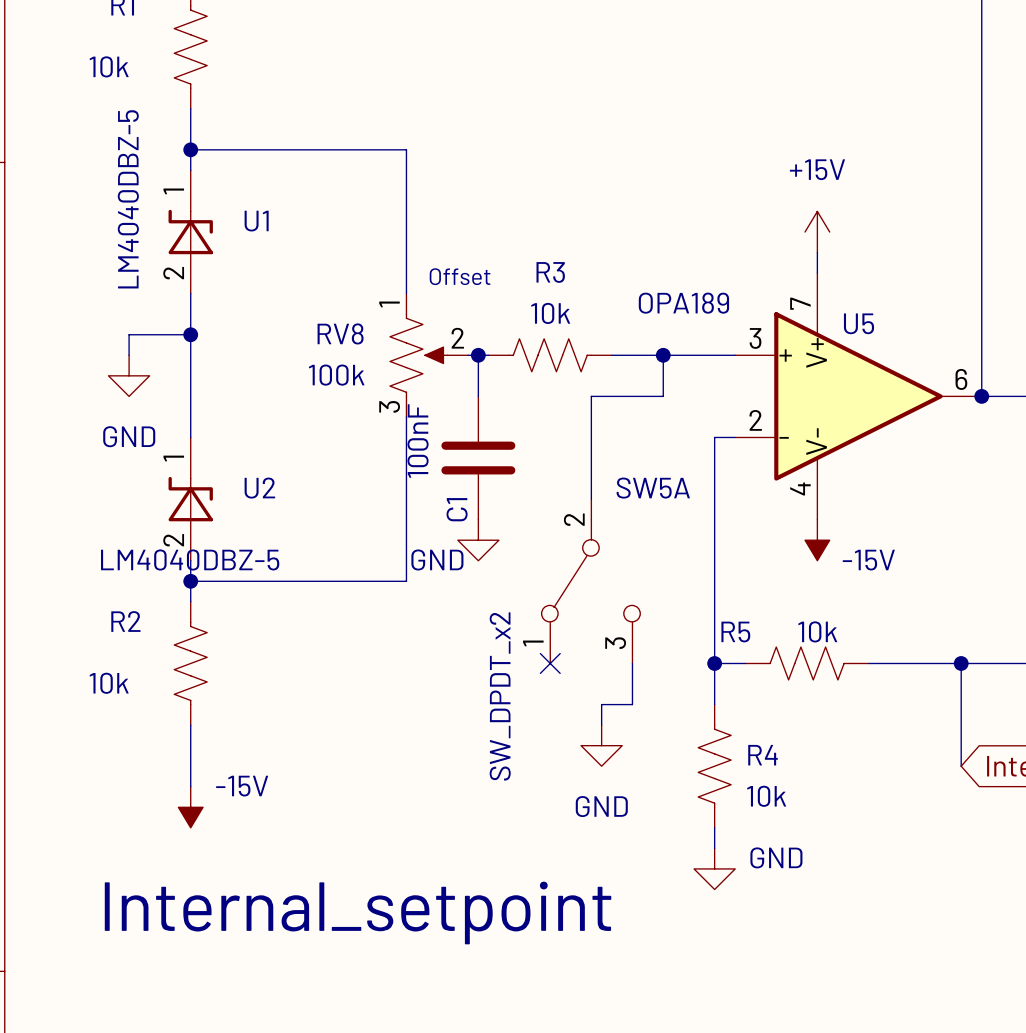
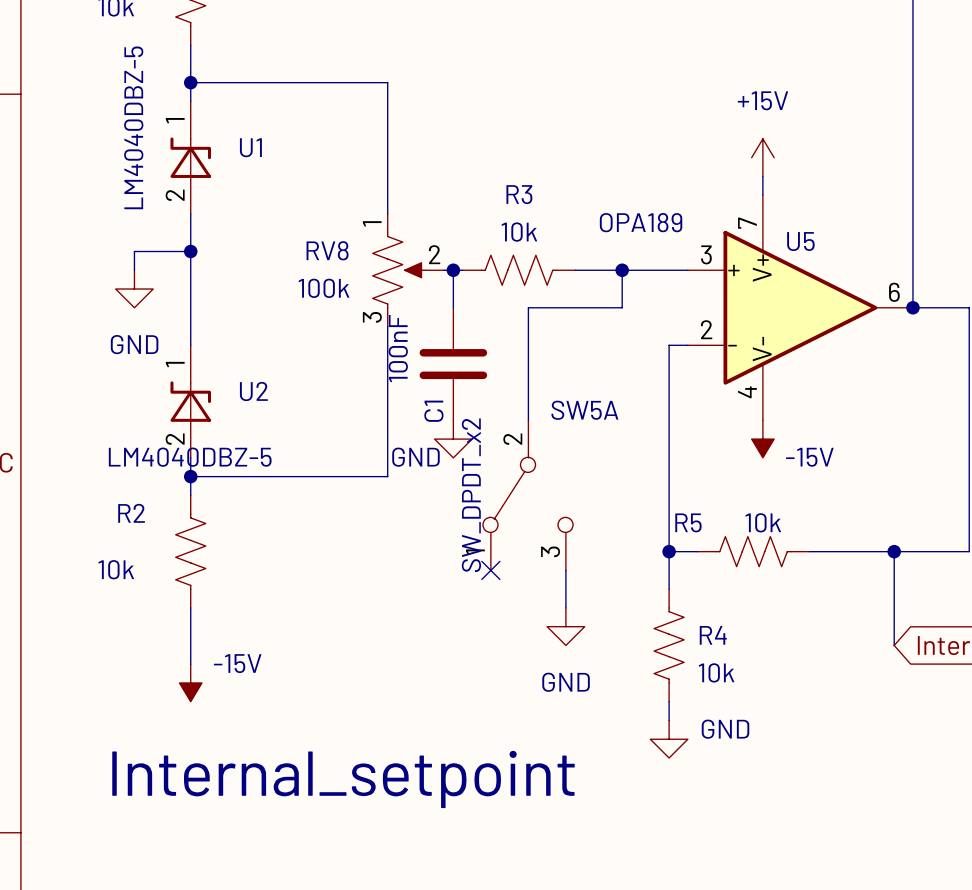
text: Offset (460, 276) -> none
wire: (591, 396) (591, 499) -> (556, 307) (528, 307) (528, 420)
SW5A position: (590, 581) -> (528, 495)
no-connect mark position: (550, 663) -> (490, 570)
wire: (632, 663) (632, 704) (601, 704) -> (565, 570) (565, 589)
SW5A value position: SW_DPDT_x2 (500, 696) -> SW_DPDT_x2 (471, 495)

